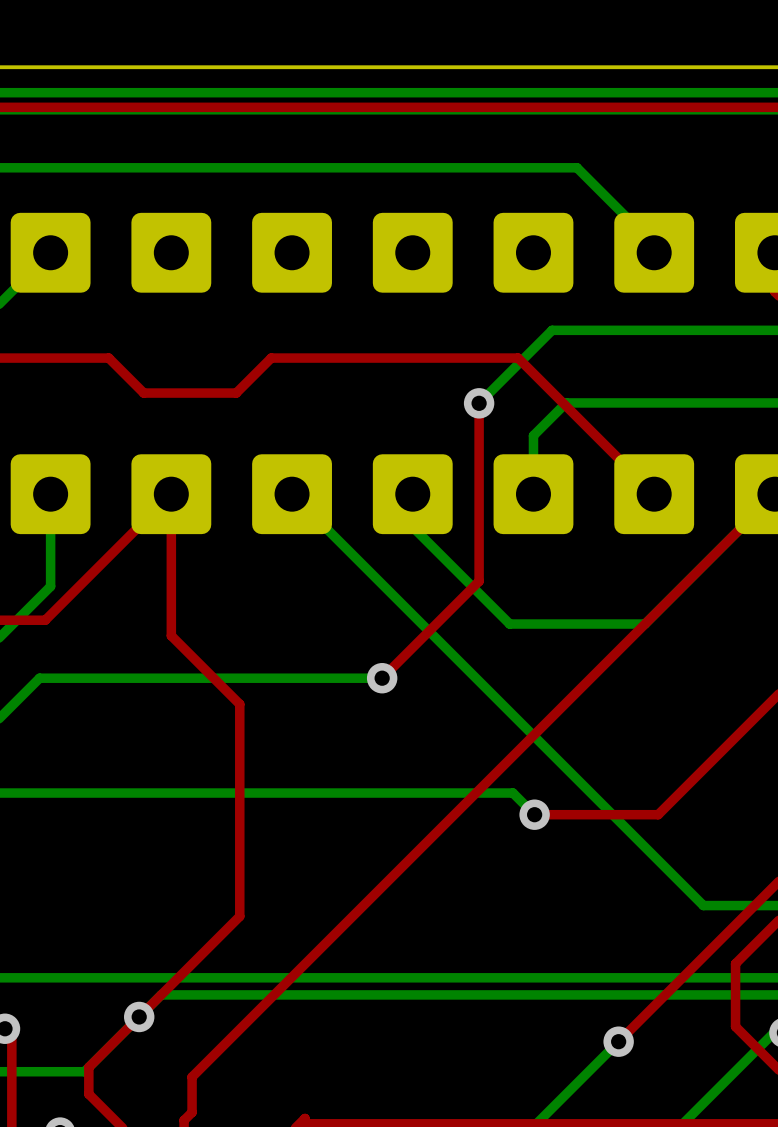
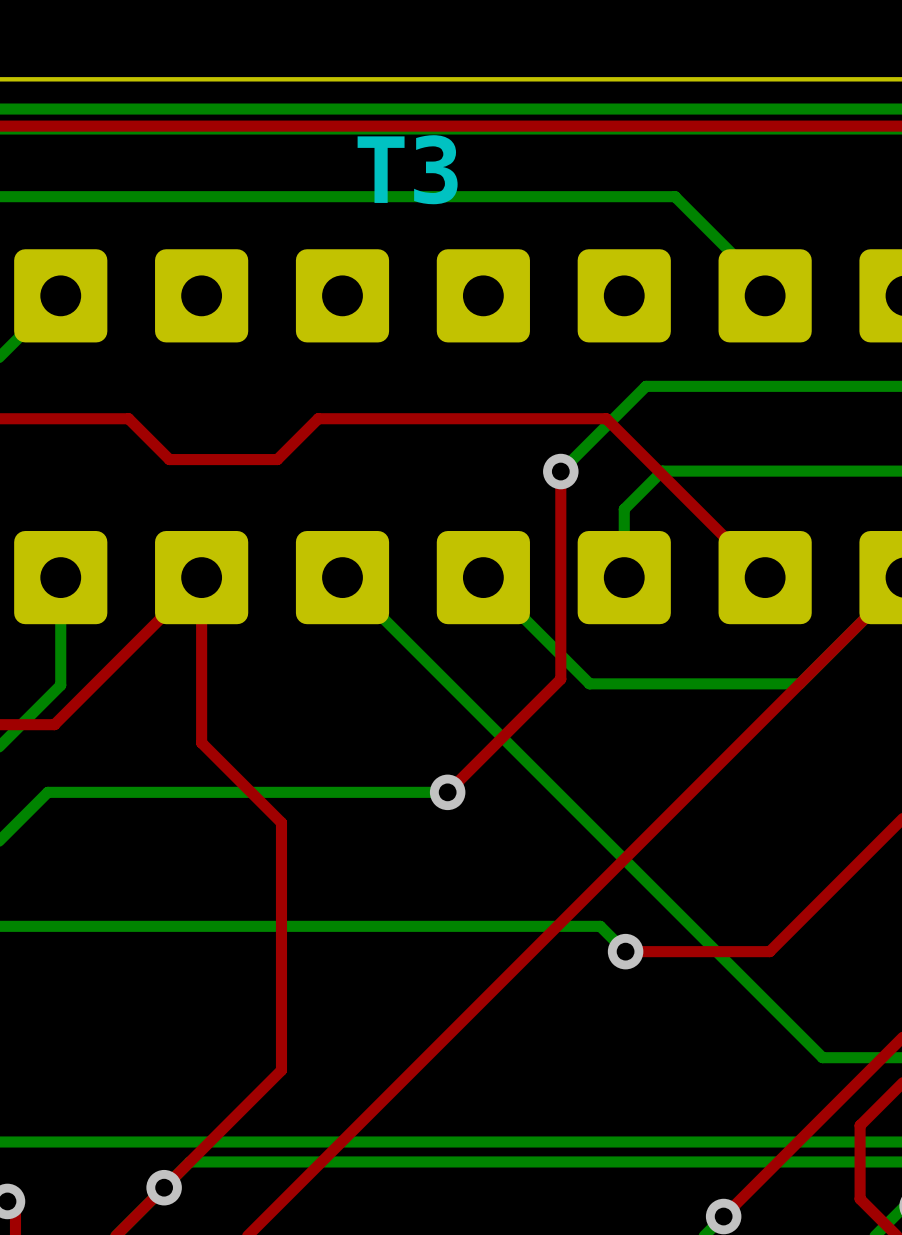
text: none -> T3 (407, 169)
bottom track: (412, 494) (412, 527) (509, 624) (645, 624) (683, 585) -> (483, 577) (589, 683) (799, 683)

